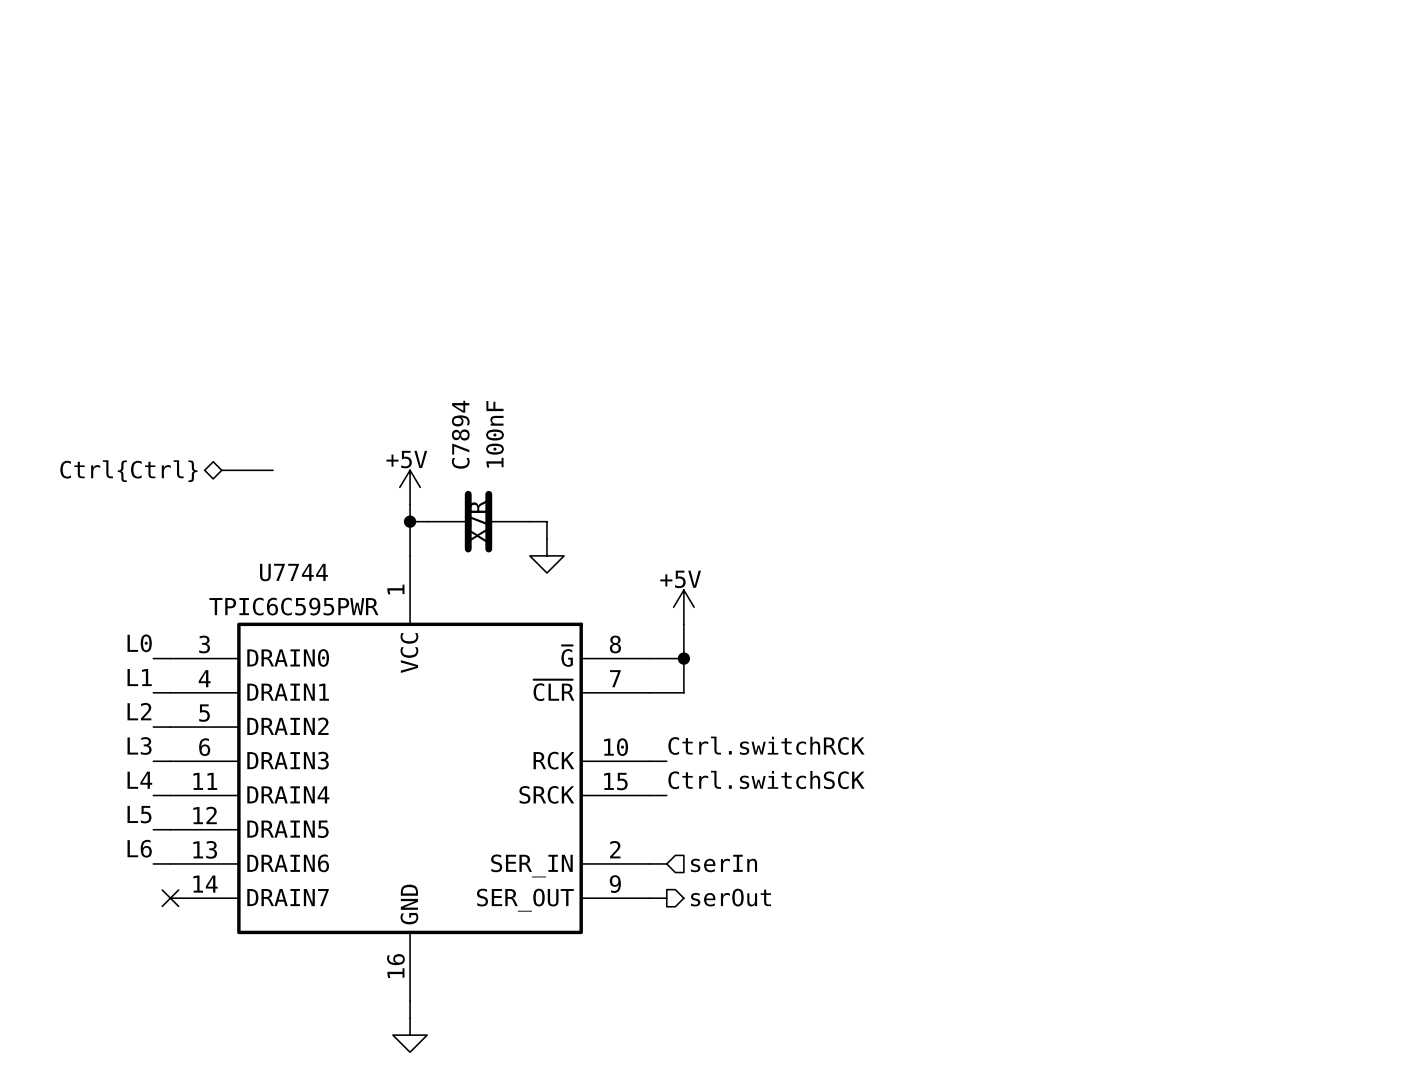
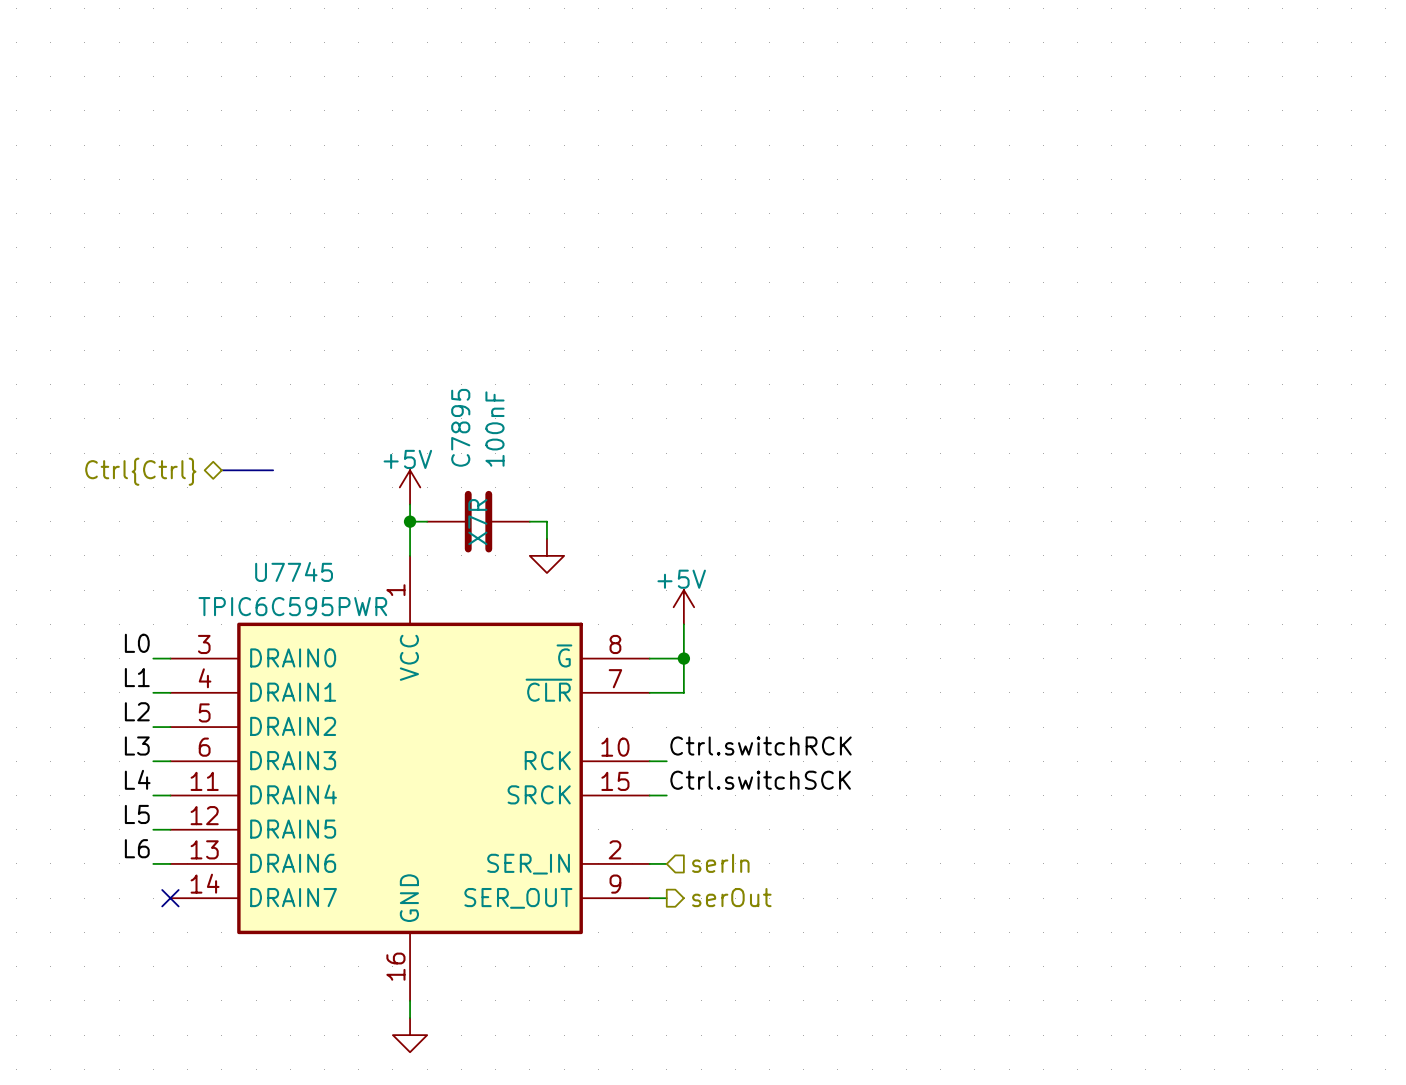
C7894 name: C7894 (460, 434) -> C7895 (460, 427)
U7744 name: U7744 (293, 572) -> U7745 (294, 571)

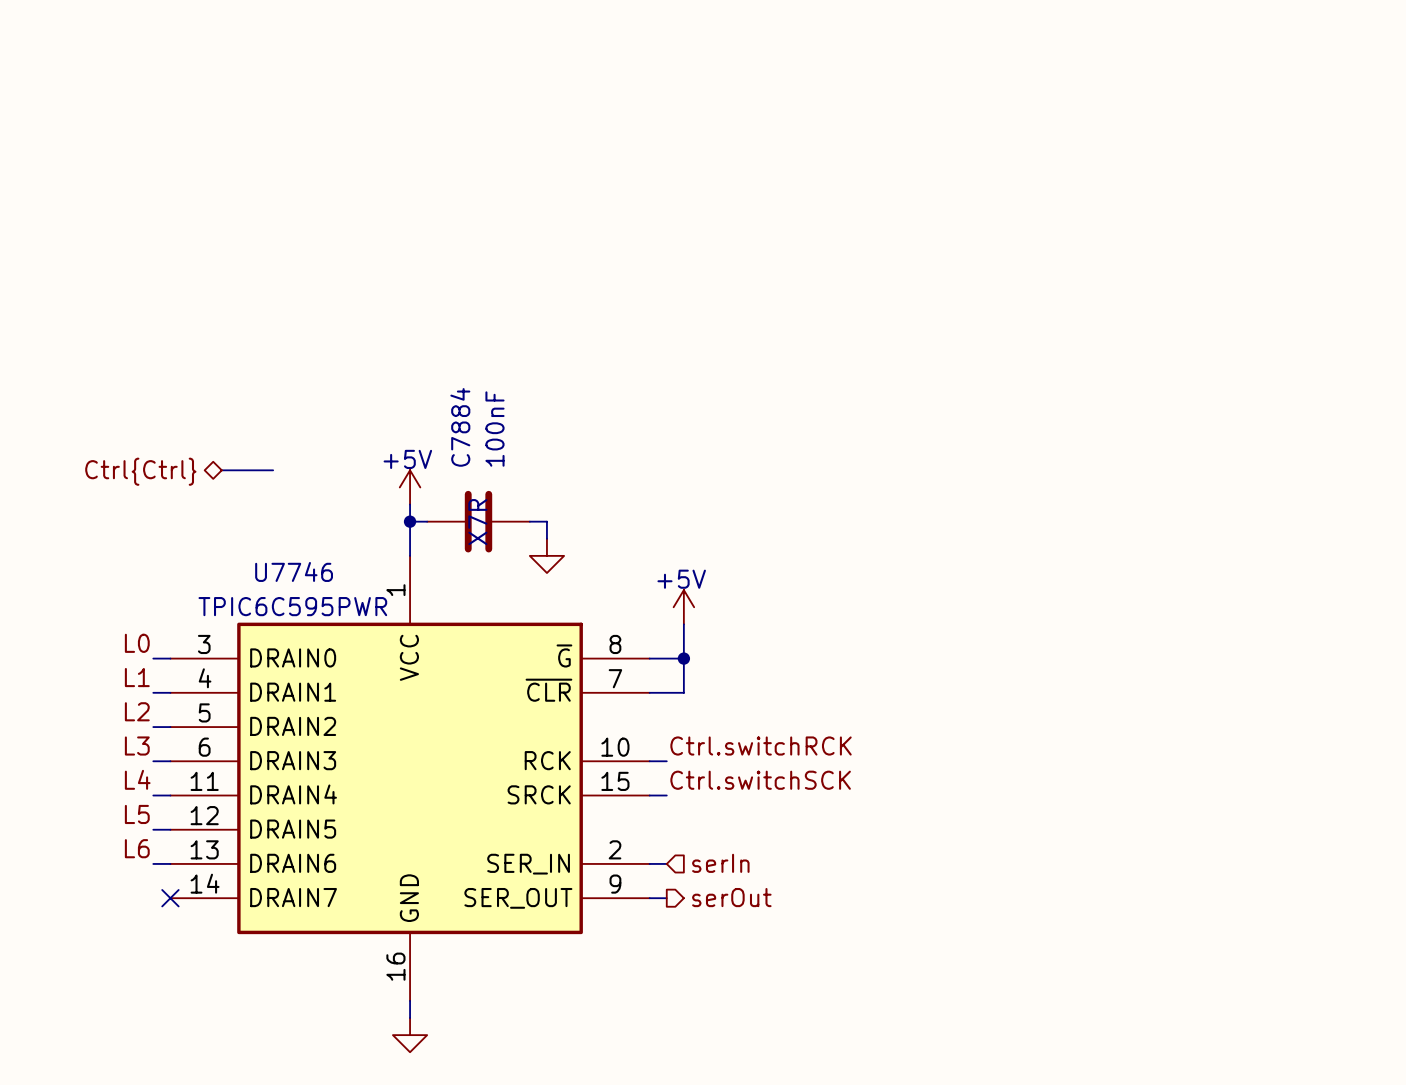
C7895 name: C7895 (460, 427) -> C7884 (460, 427)
U7745 name: U7745 (294, 571) -> U7746 (294, 571)

